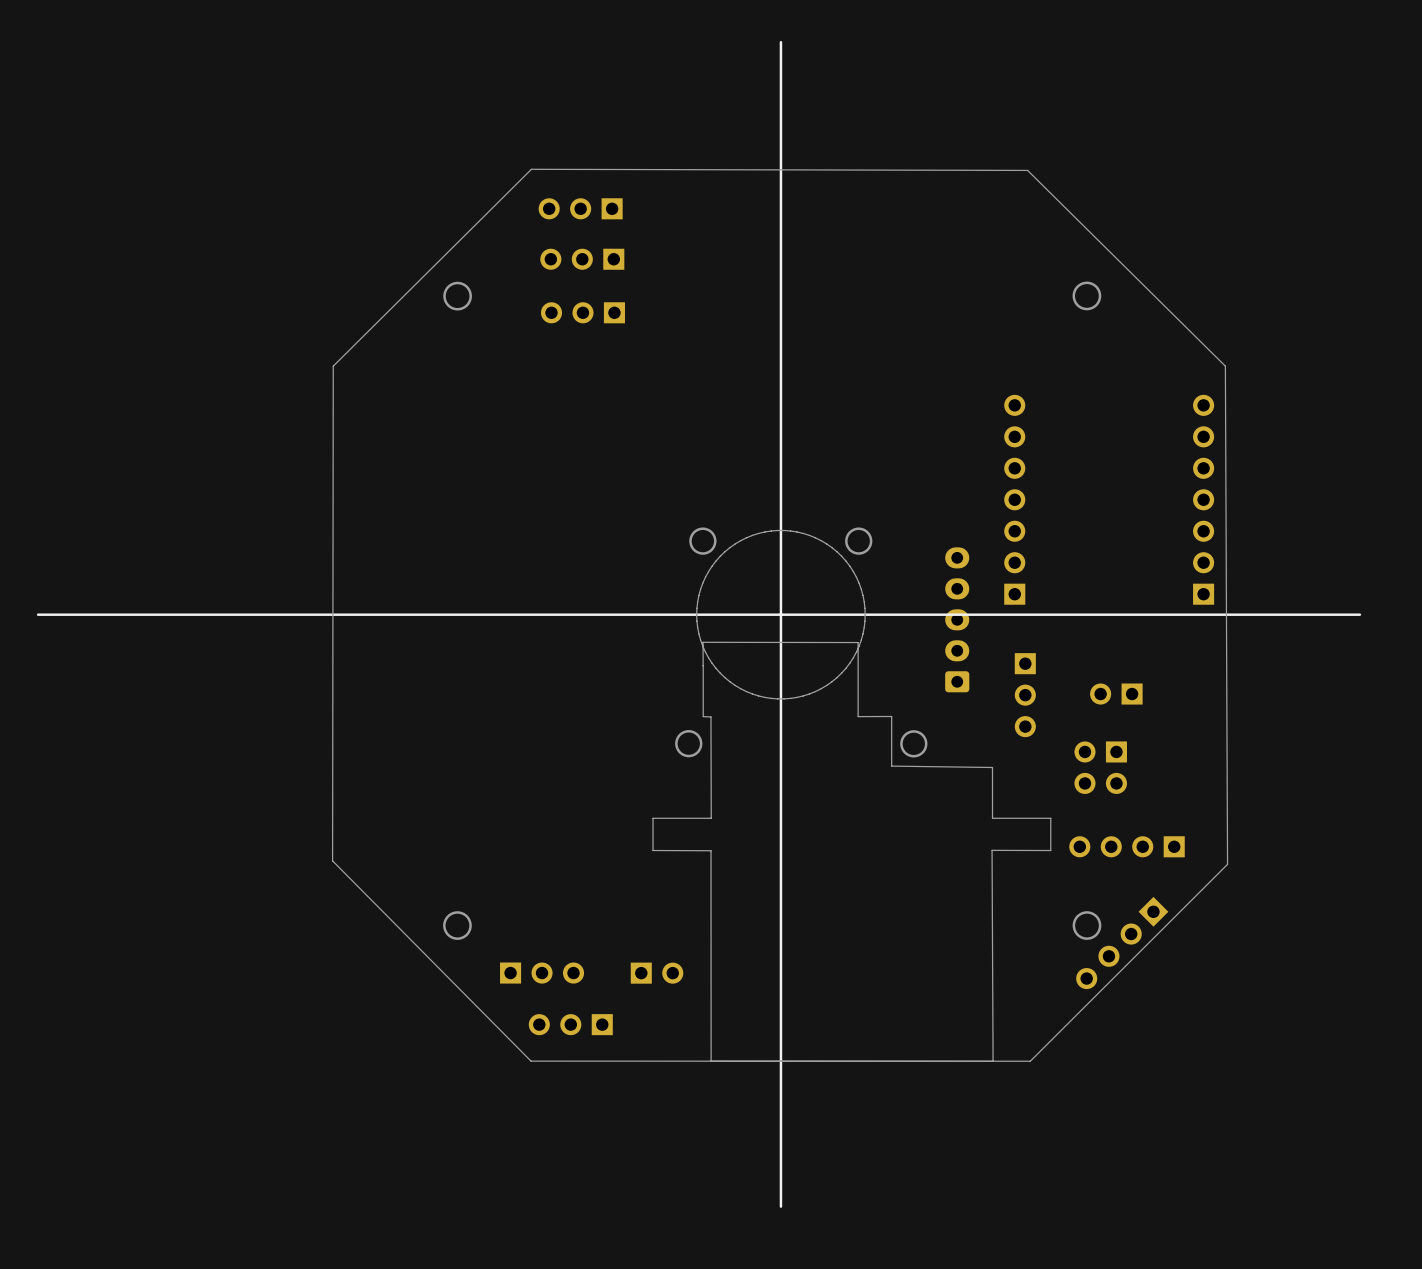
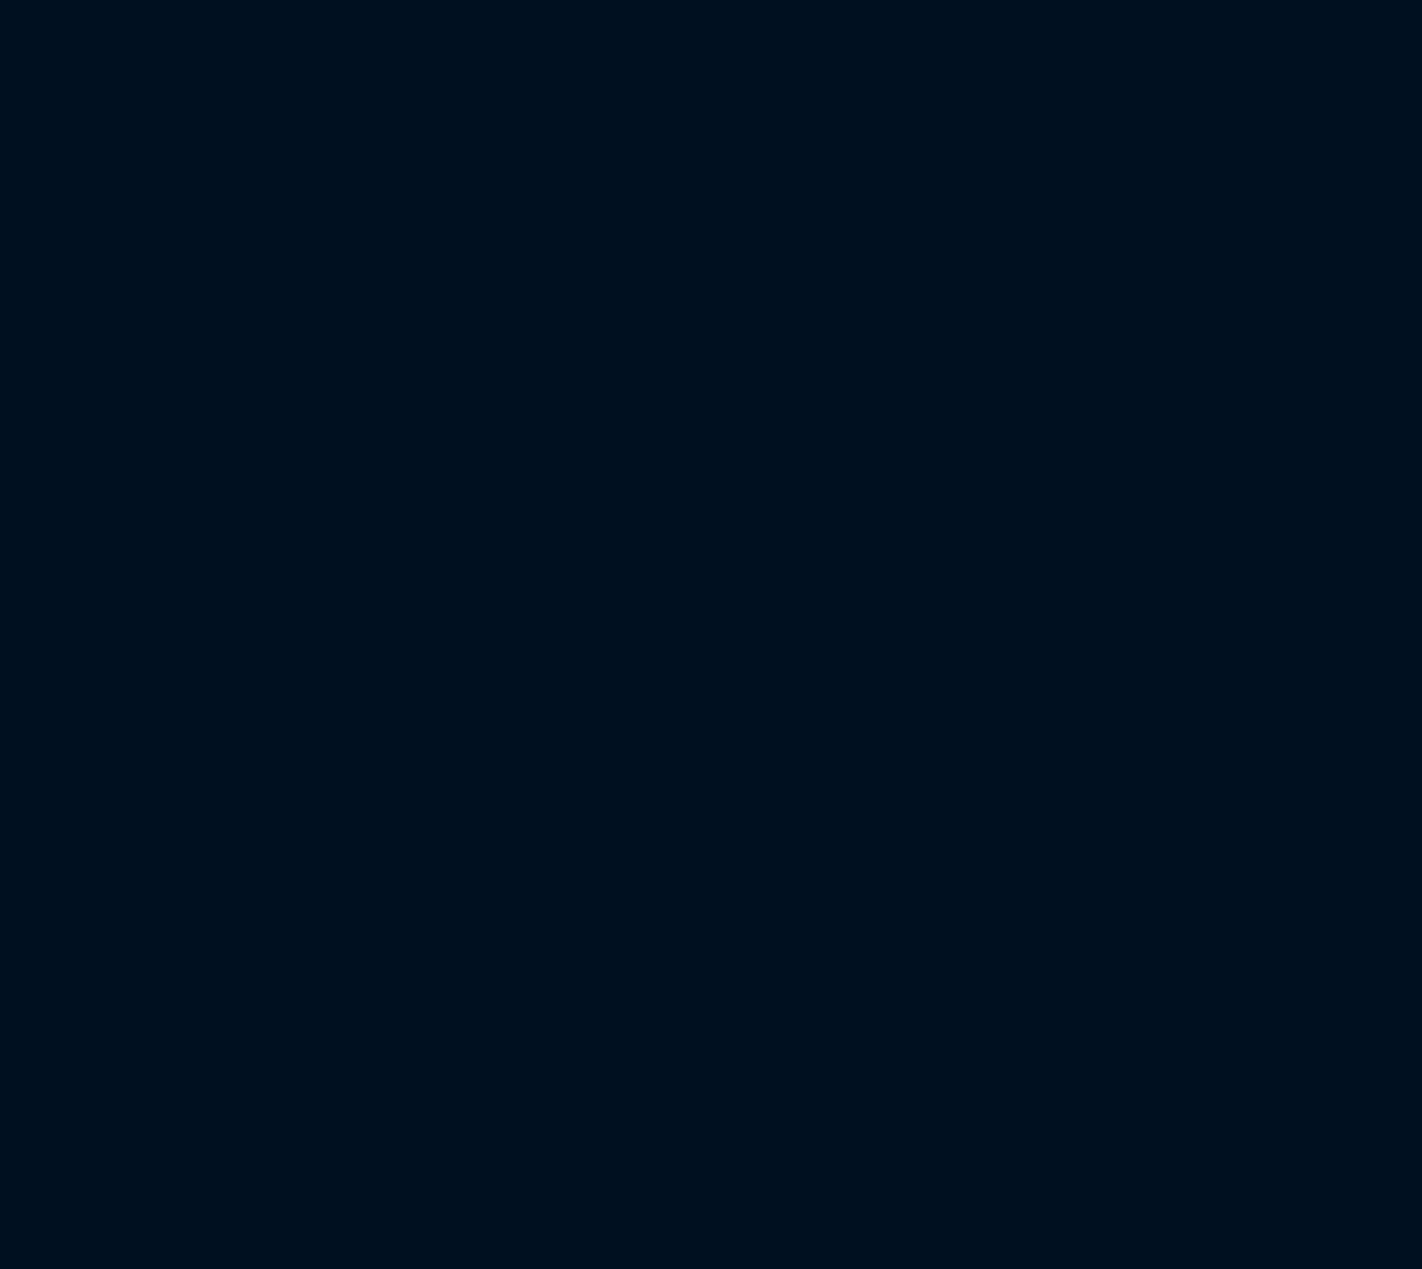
line: (780, 42) (780, 1206) -> none
board edge: (531, 169) (1027, 170) (1225, 366) (1227, 864) (1030, 1061) (531, 1061) (332, 860) (333, 366) (531, 169) -> none
part: (580, 208) -> none
part: (582, 259) -> none
round board edge: [443, 281, 472, 311] -> none
round board edge: [1072, 281, 1102, 311] -> none
part: (582, 312) -> none
part: (1014, 499) -> none
part: (1203, 499) -> none
round board edge: [689, 527, 717, 555] -> none
round board edge: [845, 527, 873, 555] -> none
board edge: (784, 530) (815, 537) (841, 556) (859, 583) (865, 614) (859, 646) (849, 663) (837, 677) (809, 693) (777, 698) (746, 691) (720, 673) (702, 646) (696, 614) (702, 583) (712, 566) (724, 551) (752, 535) (784, 530) -> none
line: (1359, 614) (38, 614) -> none
part: (957, 619) -> none
board edge: (703, 642) (703, 716) (710, 716) (711, 818) (653, 818) (653, 850) (711, 850) (711, 1061) (993, 1061) (992, 850) (1050, 850) (1050, 818) (992, 818) (992, 767) (891, 766) (891, 716) (858, 716) (858, 642) (703, 642) -> none
part: (1116, 694) -> none
part: (1025, 695) -> none
round board edge: [675, 730, 703, 758] -> none
round board edge: [900, 730, 928, 758] -> none
part: (1100, 767) -> none
part: (1127, 846) -> none
round board edge: [443, 911, 472, 940] -> none
round board edge: [1072, 911, 1102, 940] -> none
part: (1122, 942) -> none
part: (542, 973) -> none
part: (657, 973) -> none
part: (570, 1024) -> none

